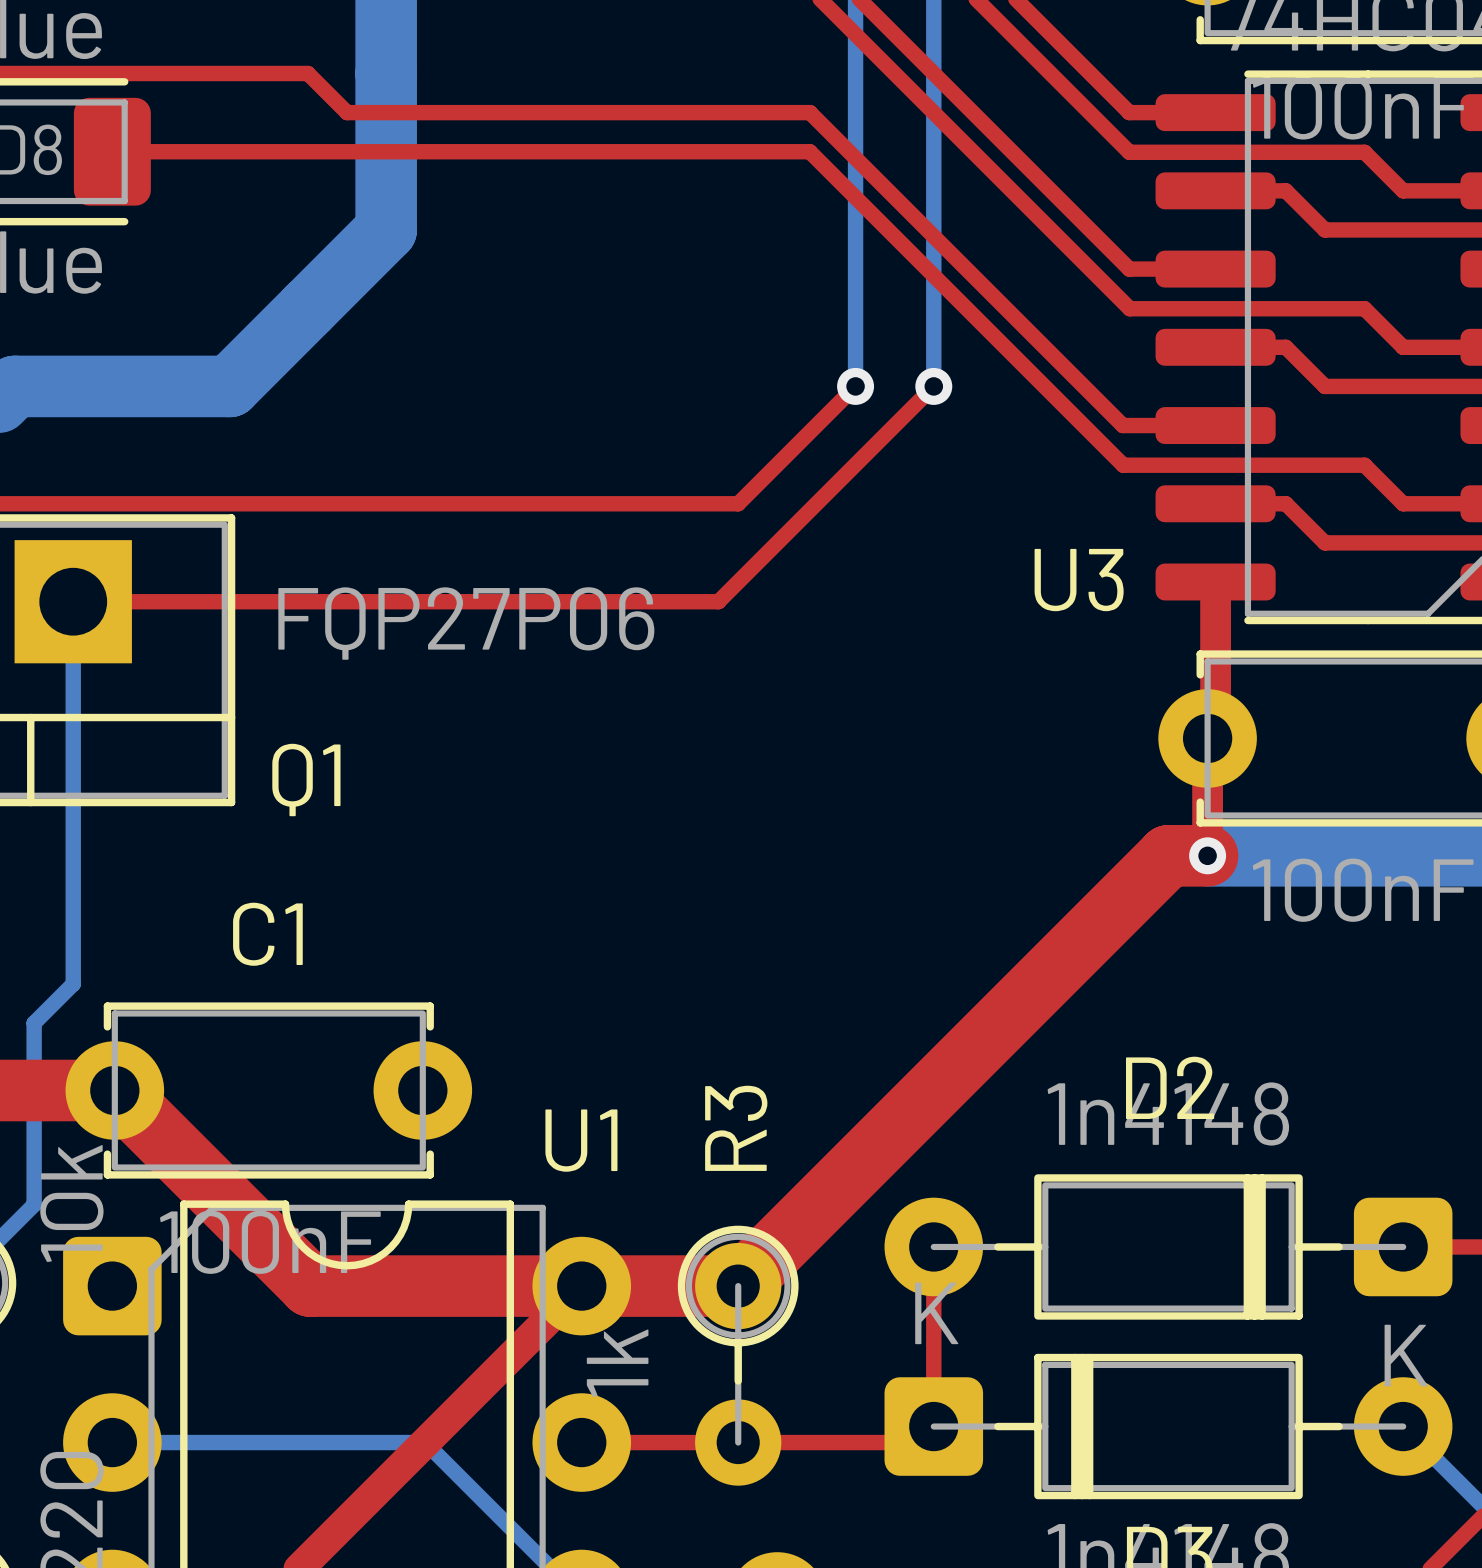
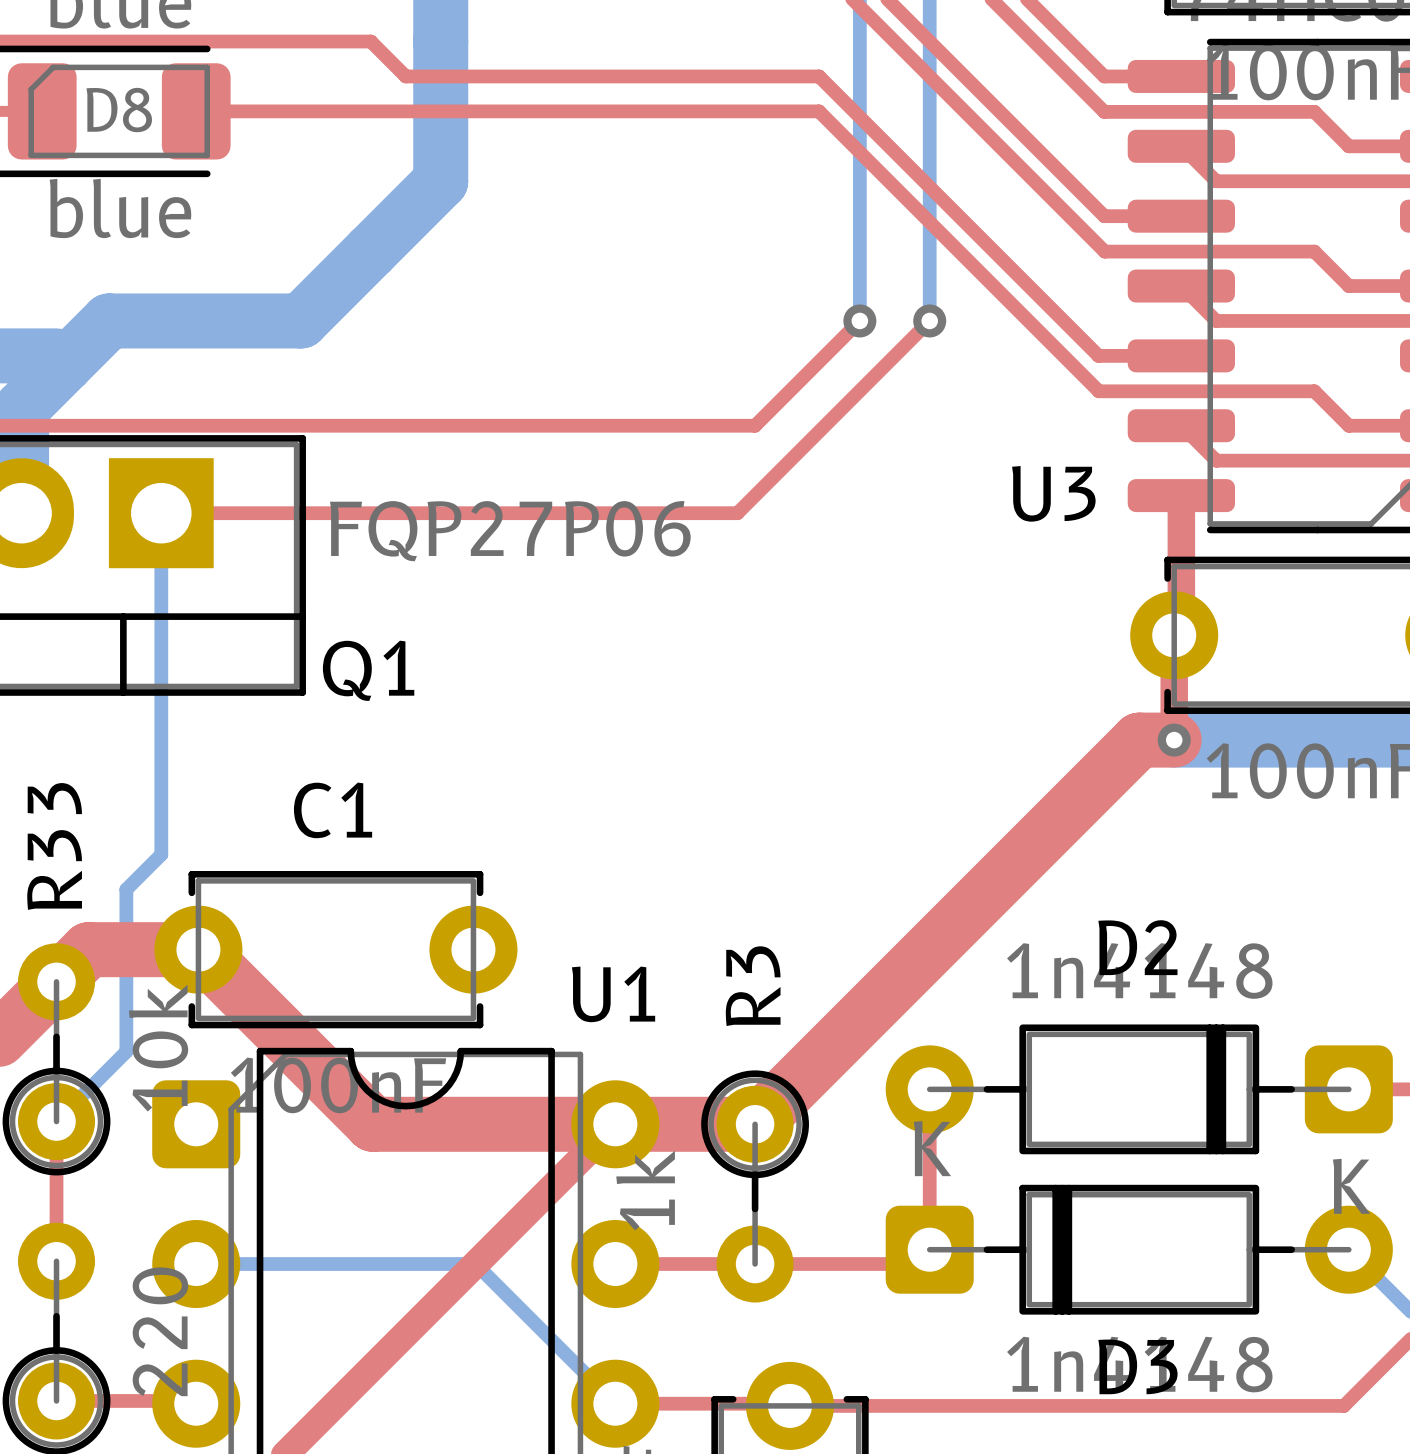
top track: (1215, 190) (1285, 190) (1324, 229) -> (1181, 146) (1216, 181) (1278, 181)
top track: (1215, 347) (1285, 347) (1324, 386) -> (1181, 286) (1216, 320) (1278, 320)
top track: (1215, 503) (1285, 503) (1324, 542) -> (1181, 425) (1216, 460) (1278, 460)

